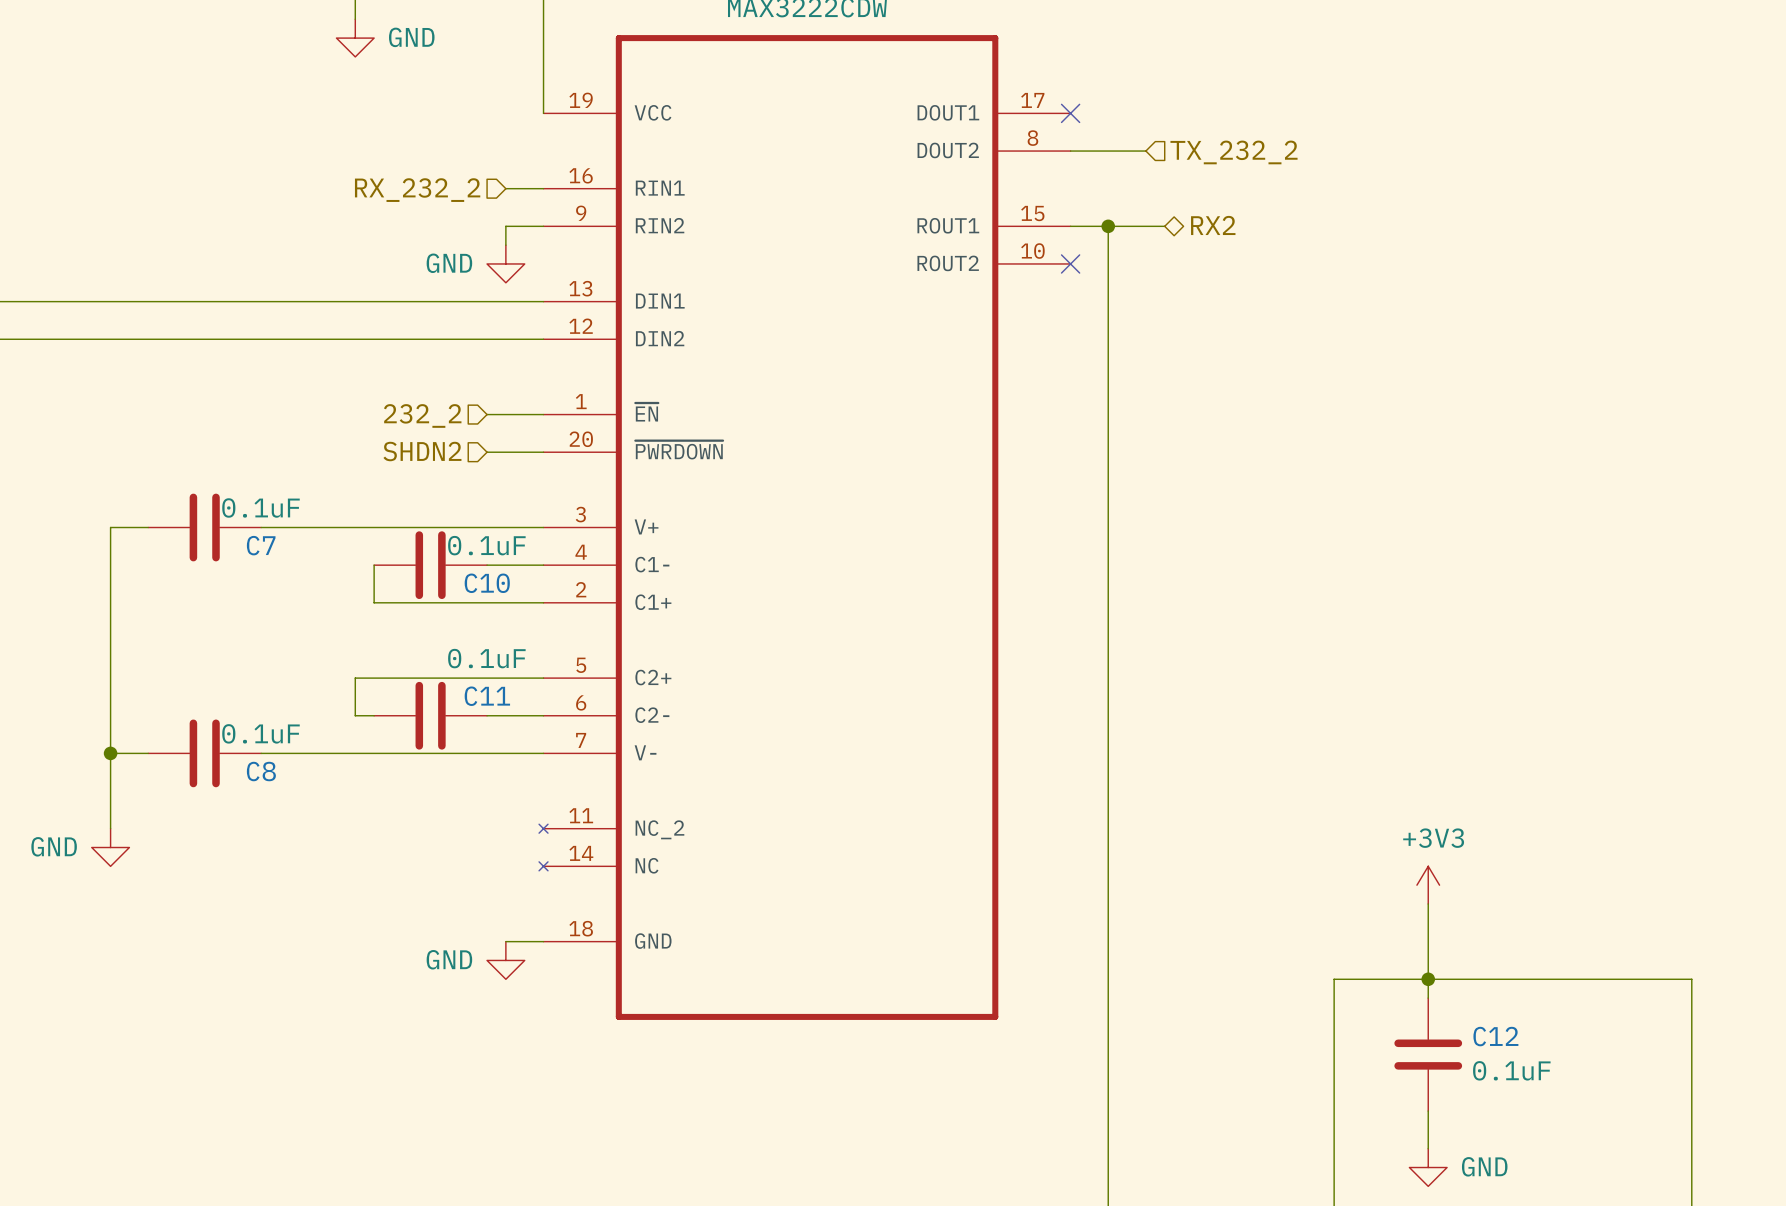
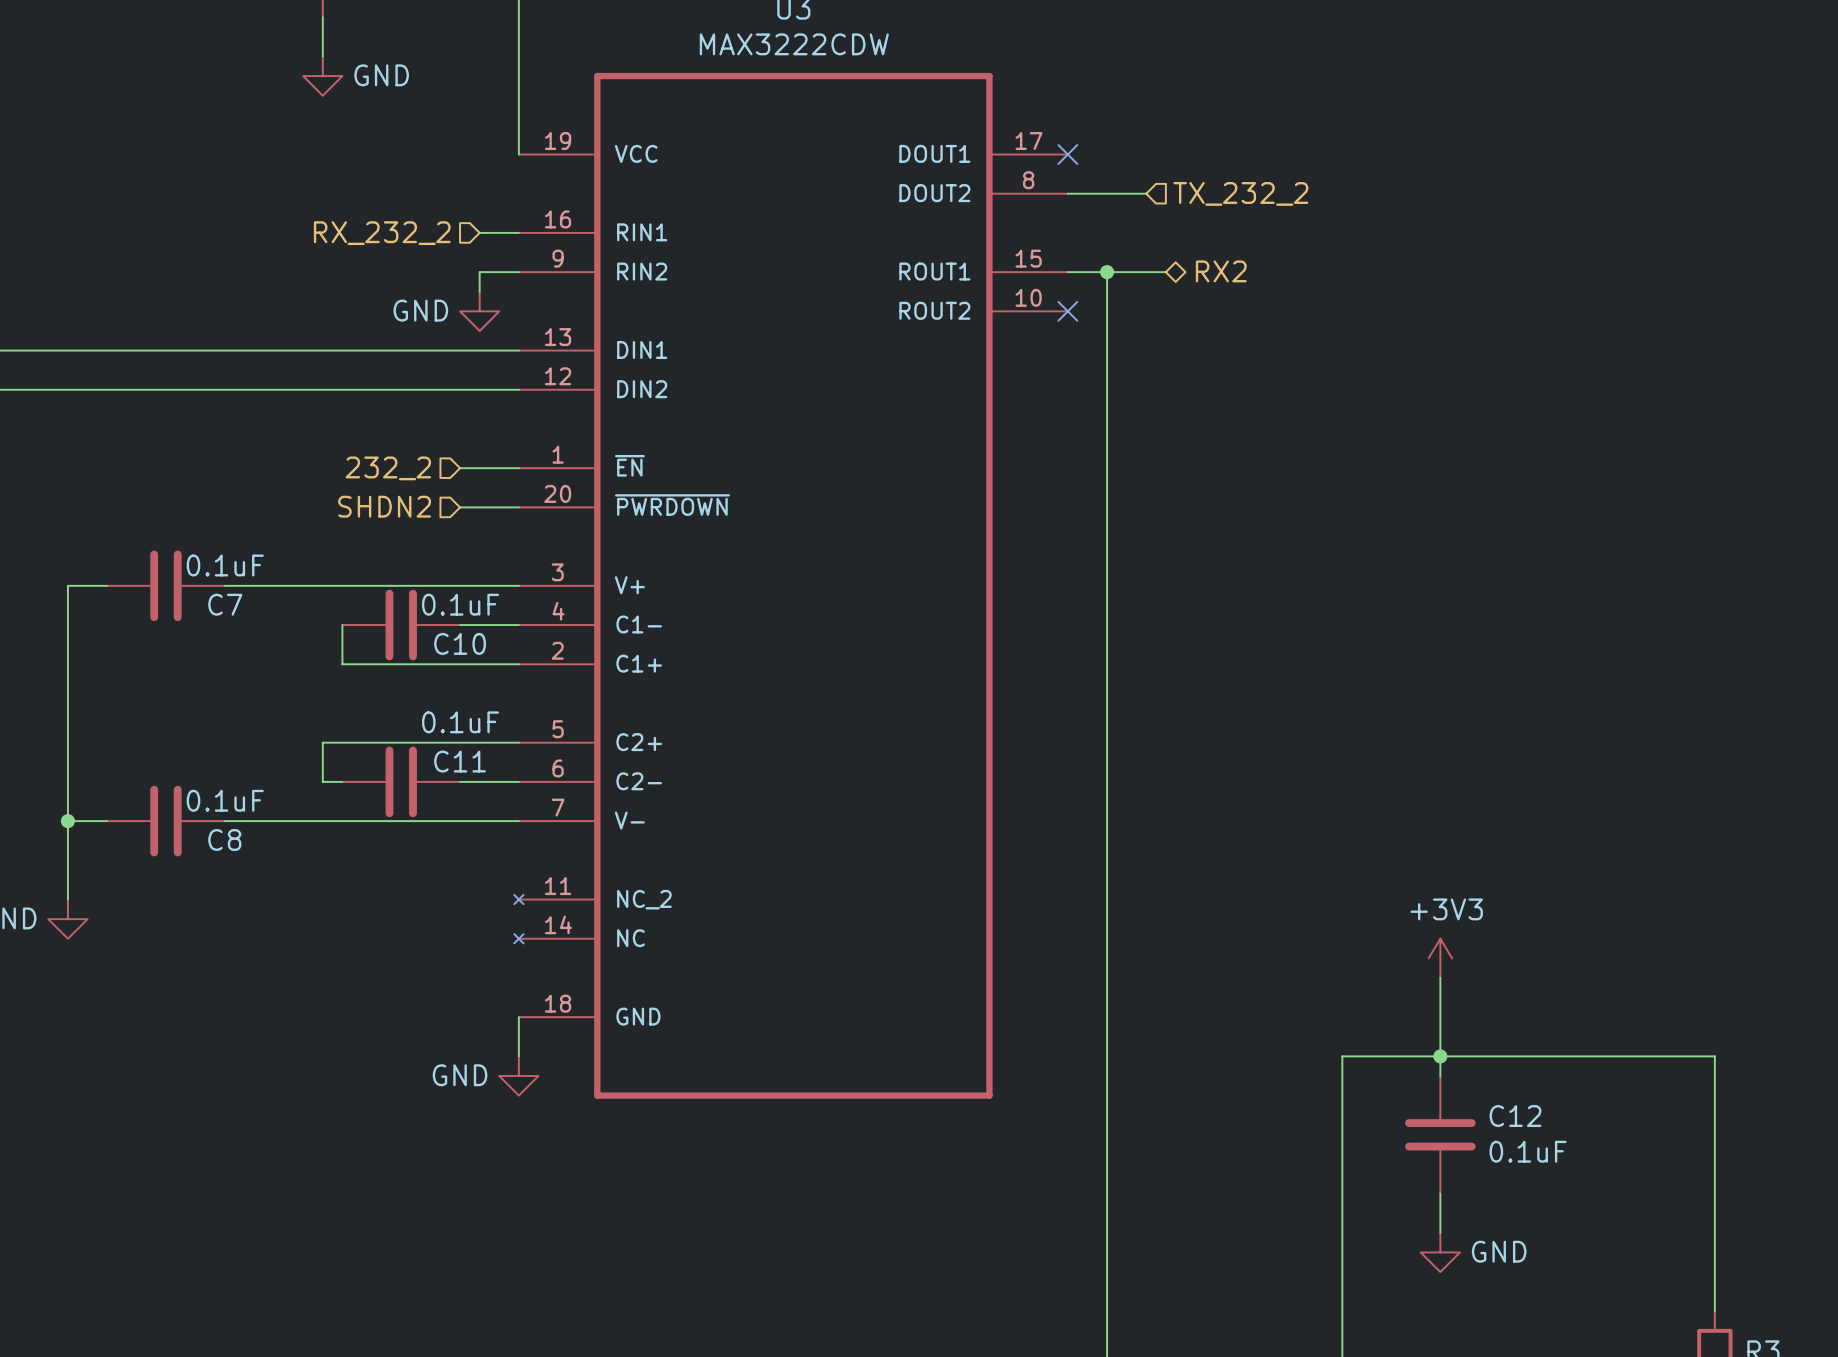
wire: (505, 941) (543, 941) -> (518, 1056) (518, 1017)
power symbol position: GND (505, 960) -> GND (518, 1075)

